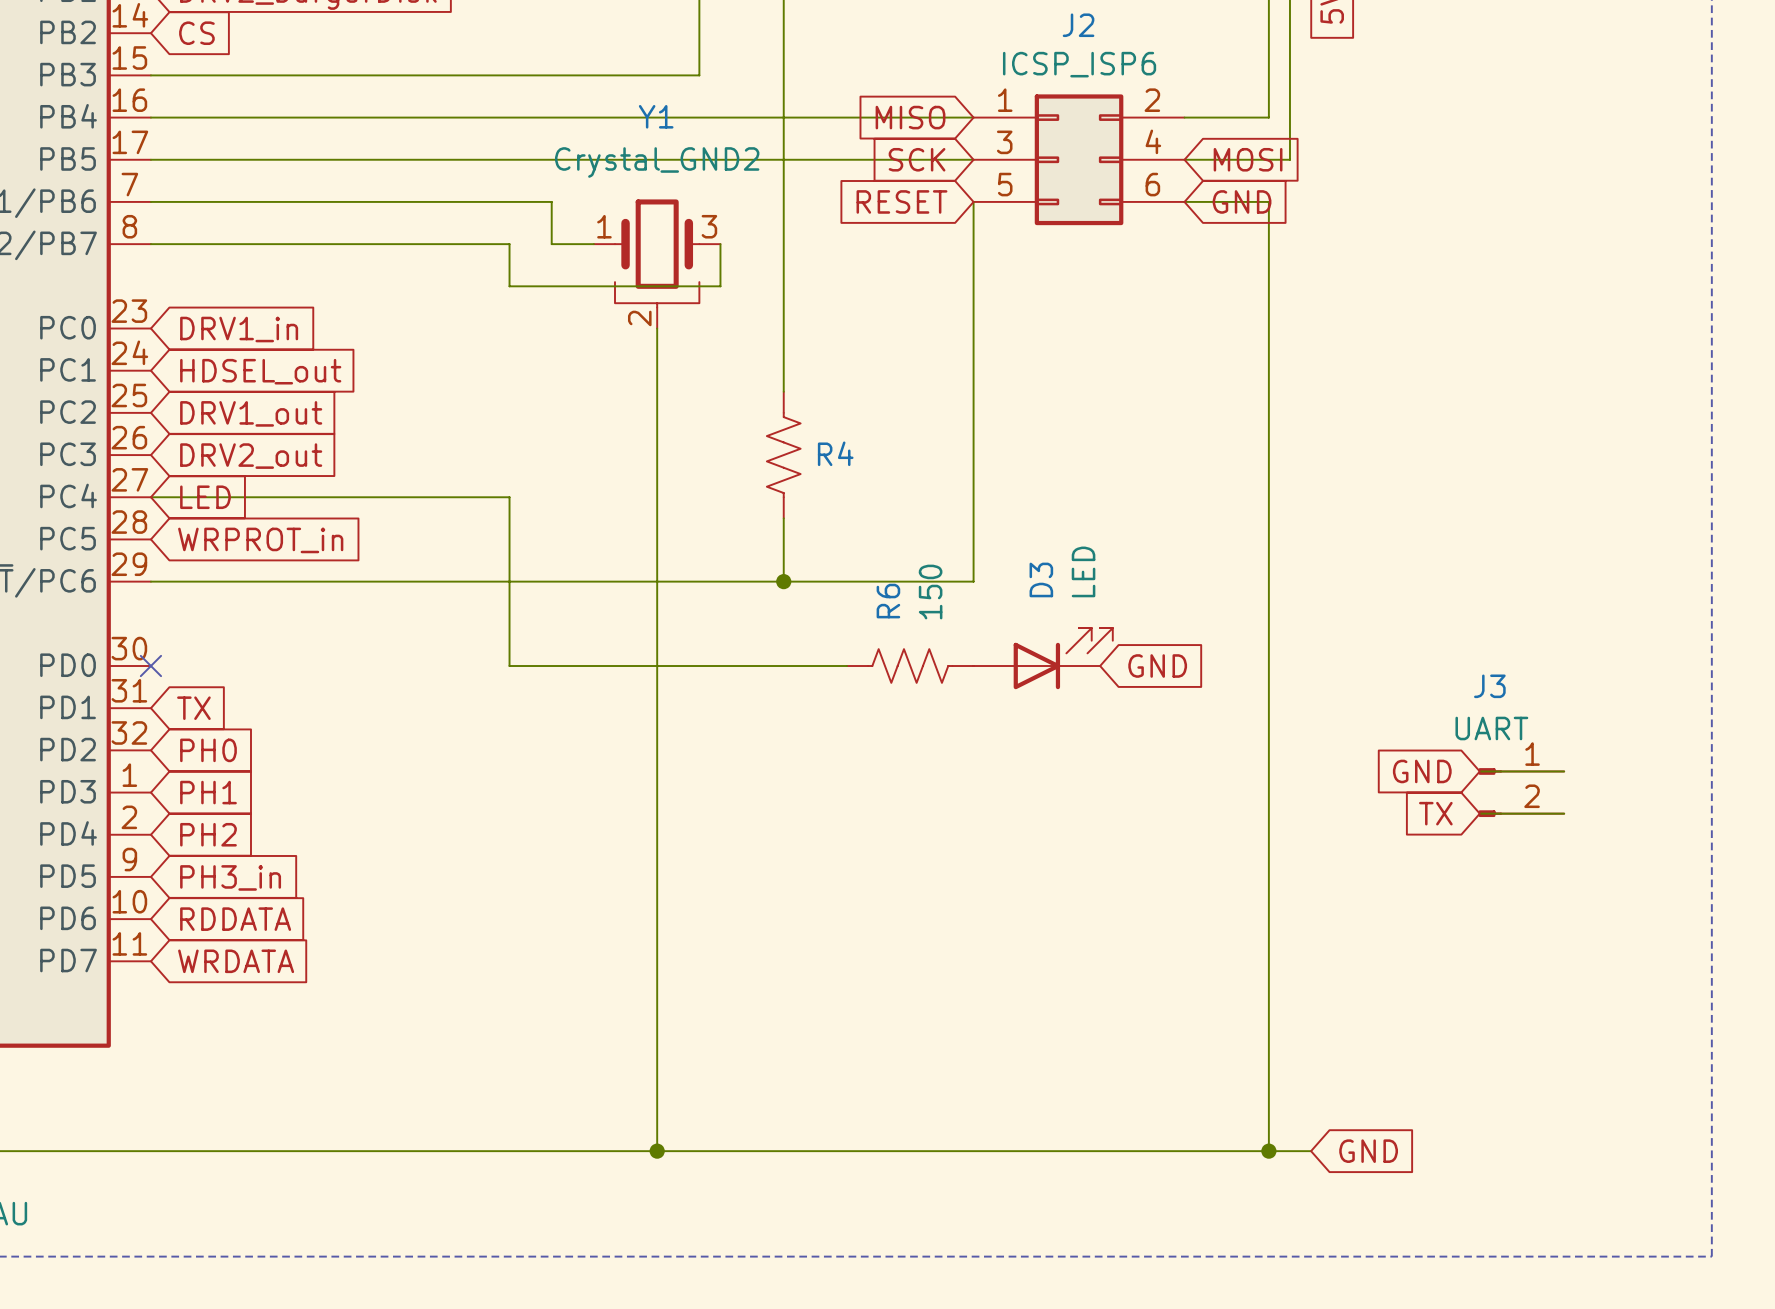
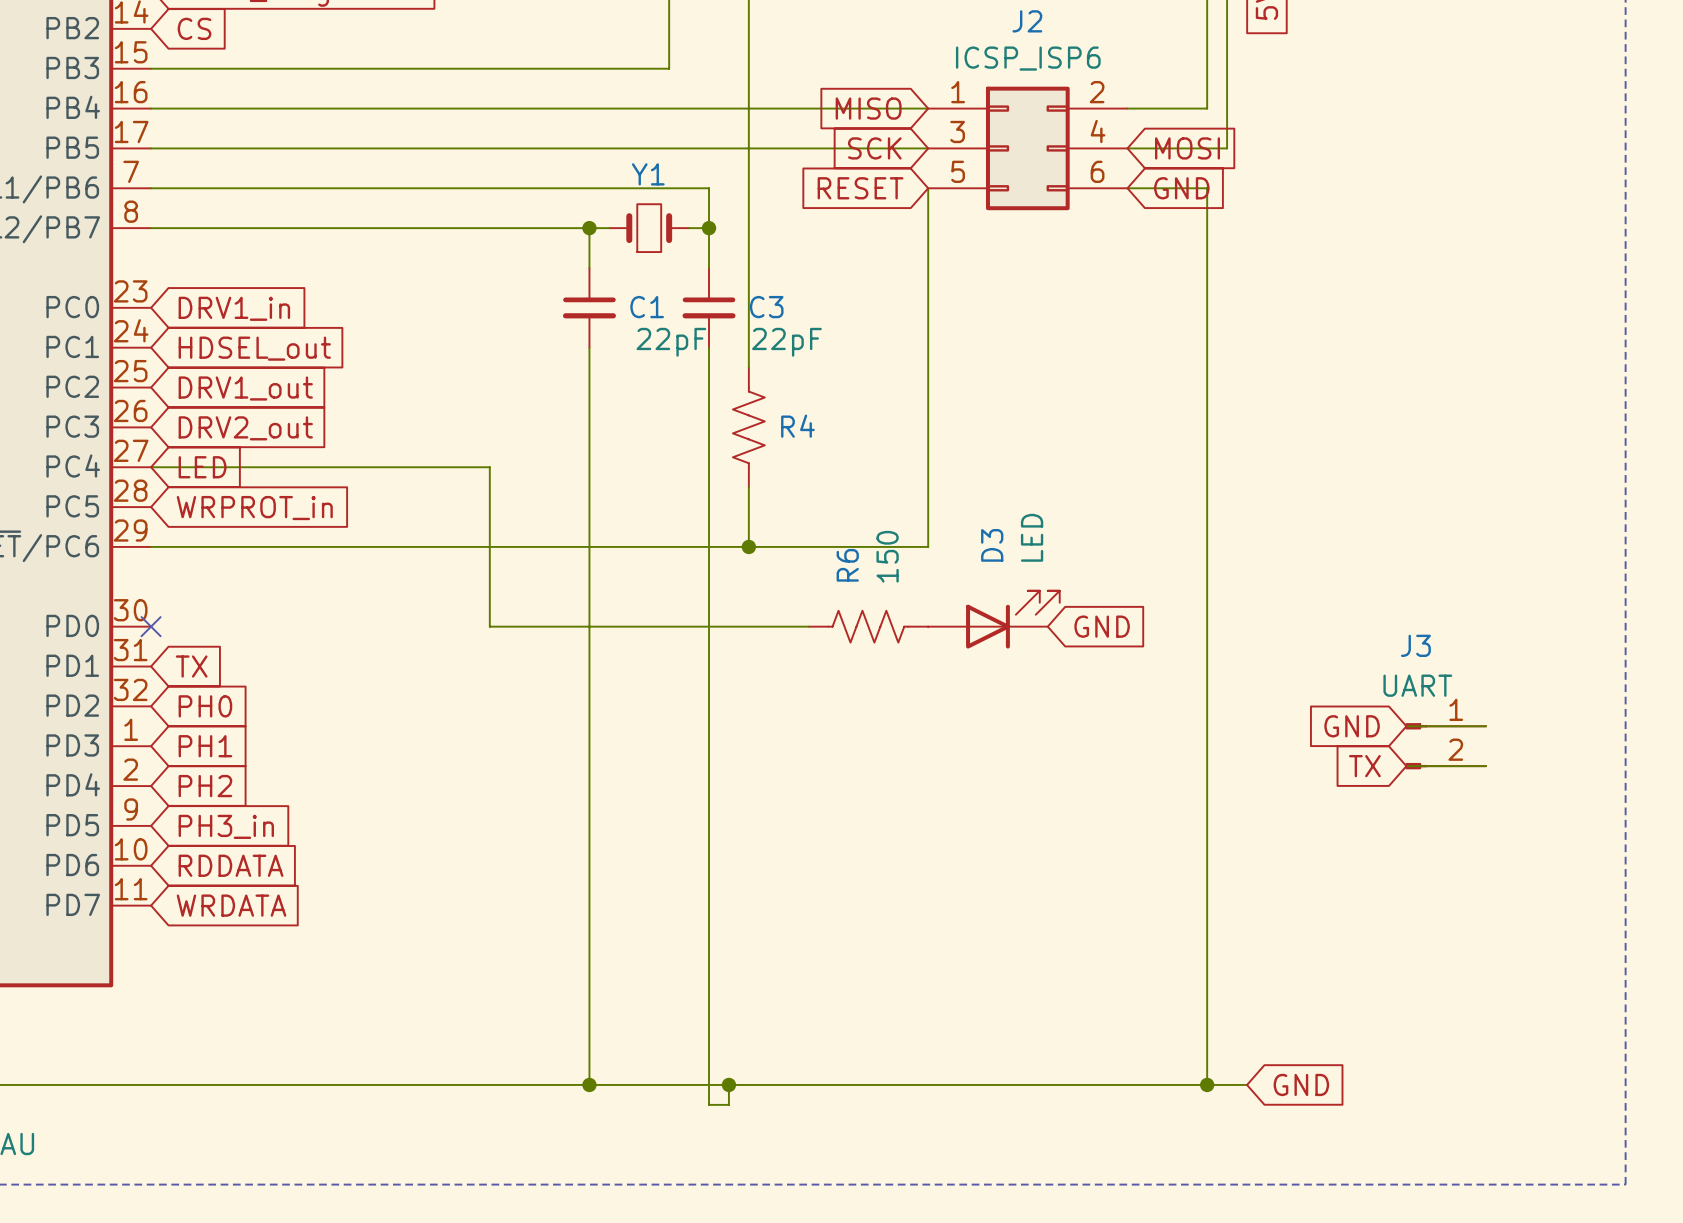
Y1 name position: Y1 (656, 116) -> Y1 (648, 174)
Y1 value: Crystal_GND2 (657, 162) -> none
Y1 symbol: [593, 199, 721, 329] -> [609, 204, 690, 253]
wire: (551, 201) (551, 244) -> (489, 228) (529, 228)
wire: none -> (529, 188) (709, 188) (709, 267)
wire: (509, 244) (509, 286) (720, 286) (720, 244) -> (709, 228) (689, 228)
wire: none -> (589, 228) (589, 267)
junction: none -> (589, 228)
junction: none -> (709, 228)
C1: none -> 22pF (589, 307)
wire: (657, 328) (657, 1151) -> none
C3: none -> 22pF (709, 307)
wire: none -> (589, 347) (589, 1084)
wire: none -> (709, 347) (709, 1104) (728, 1104) (728, 1084)
junction position: (657, 1151) -> (589, 1084)
junction: none -> (728, 1084)

